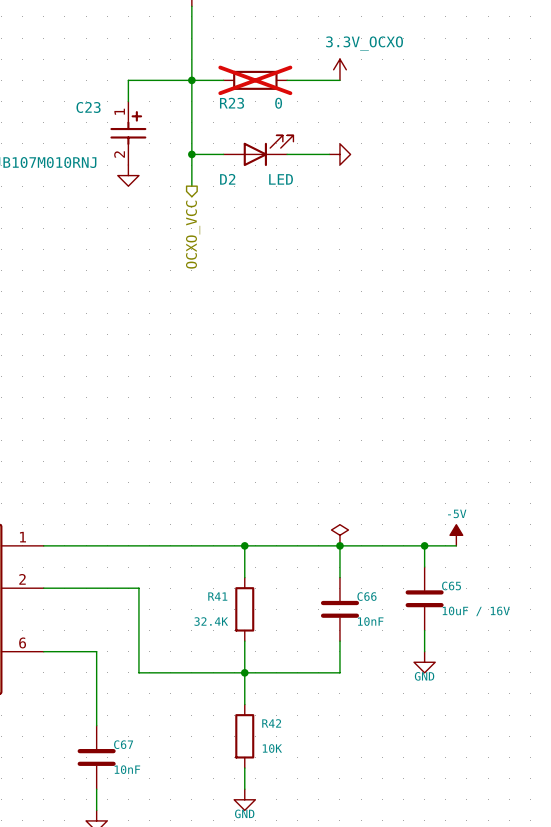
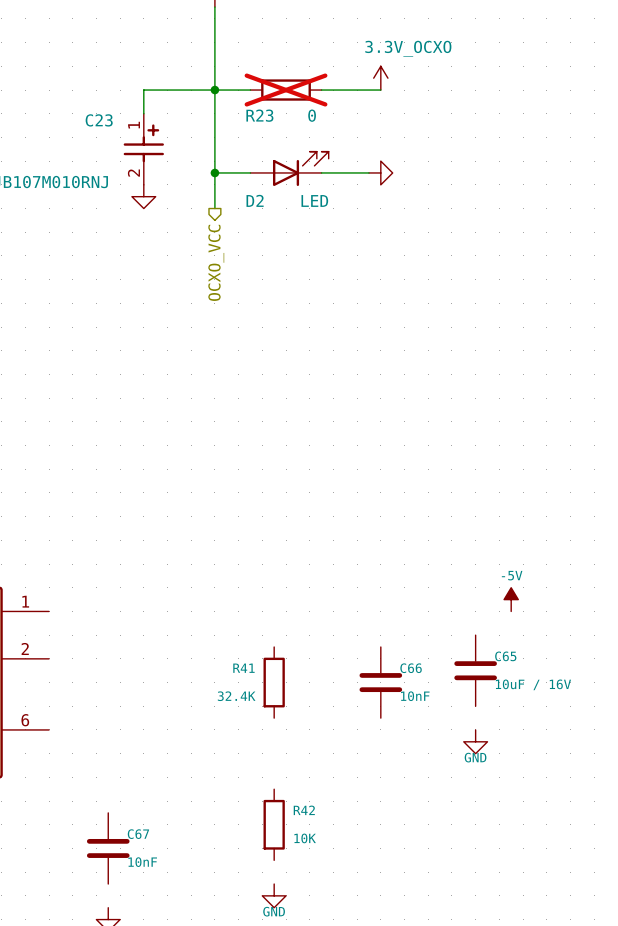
power symbol: (339, 535) -> none
wire: (43, 545) (456, 545) -> none
wire: (244, 545) (244, 577) -> none
junction: (244, 545) -> none
wire: (339, 545) (339, 577) -> none
junction: (339, 545) -> none
wire: (424, 545) (424, 567) -> none
junction: (424, 545) -> none
wire: (43, 588) (138, 588) (138, 672) (339, 672) (339, 641) -> none
wire: (424, 630) (424, 651) -> none
wire: (244, 641) (244, 704) -> none
wire: (43, 651) (96, 651) (96, 725) -> none
junction: (244, 672) -> none
wire: (244, 768) (244, 789) -> none
wire: (96, 789) (96, 810) -> none

